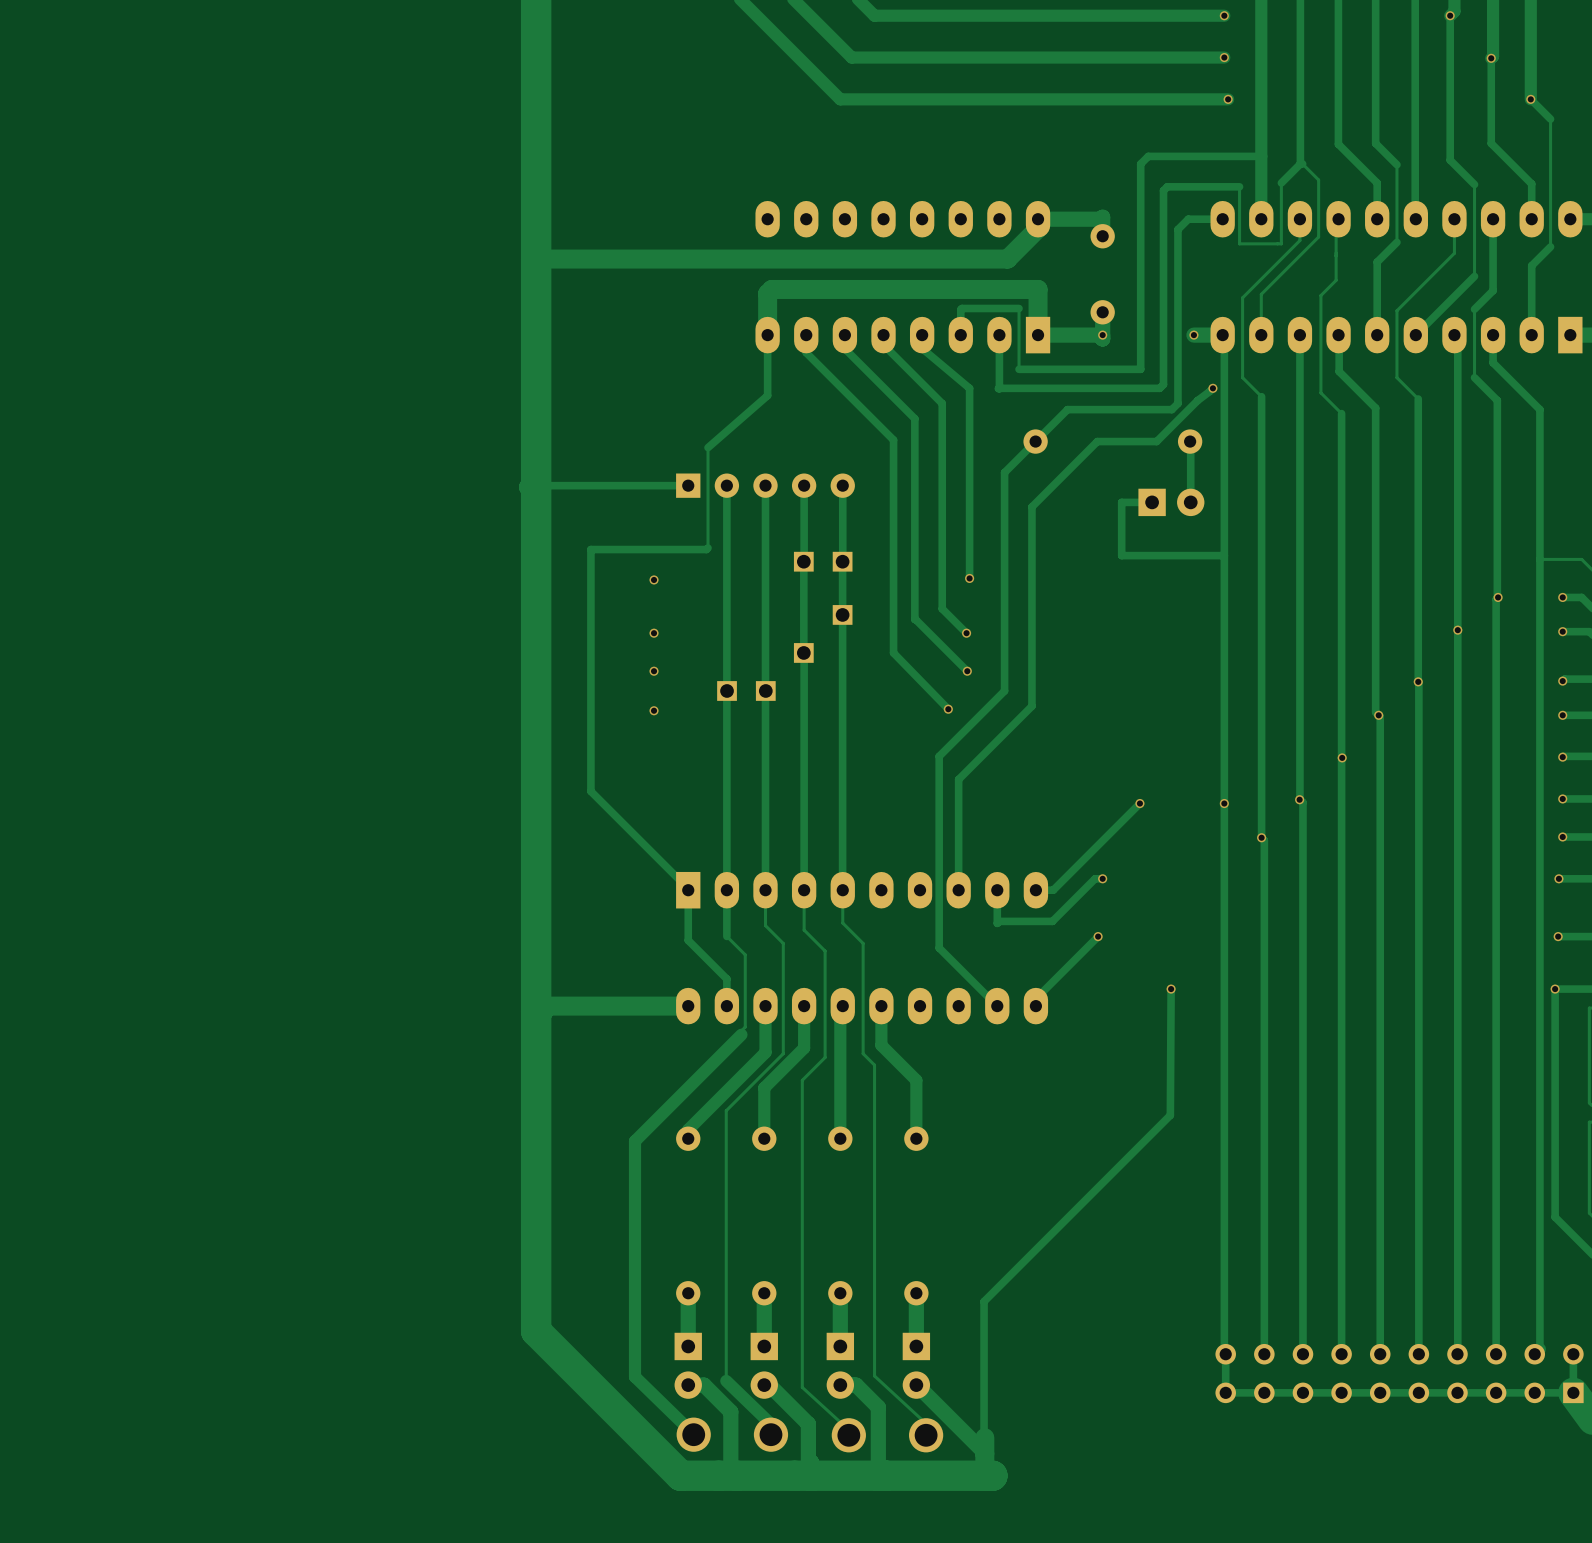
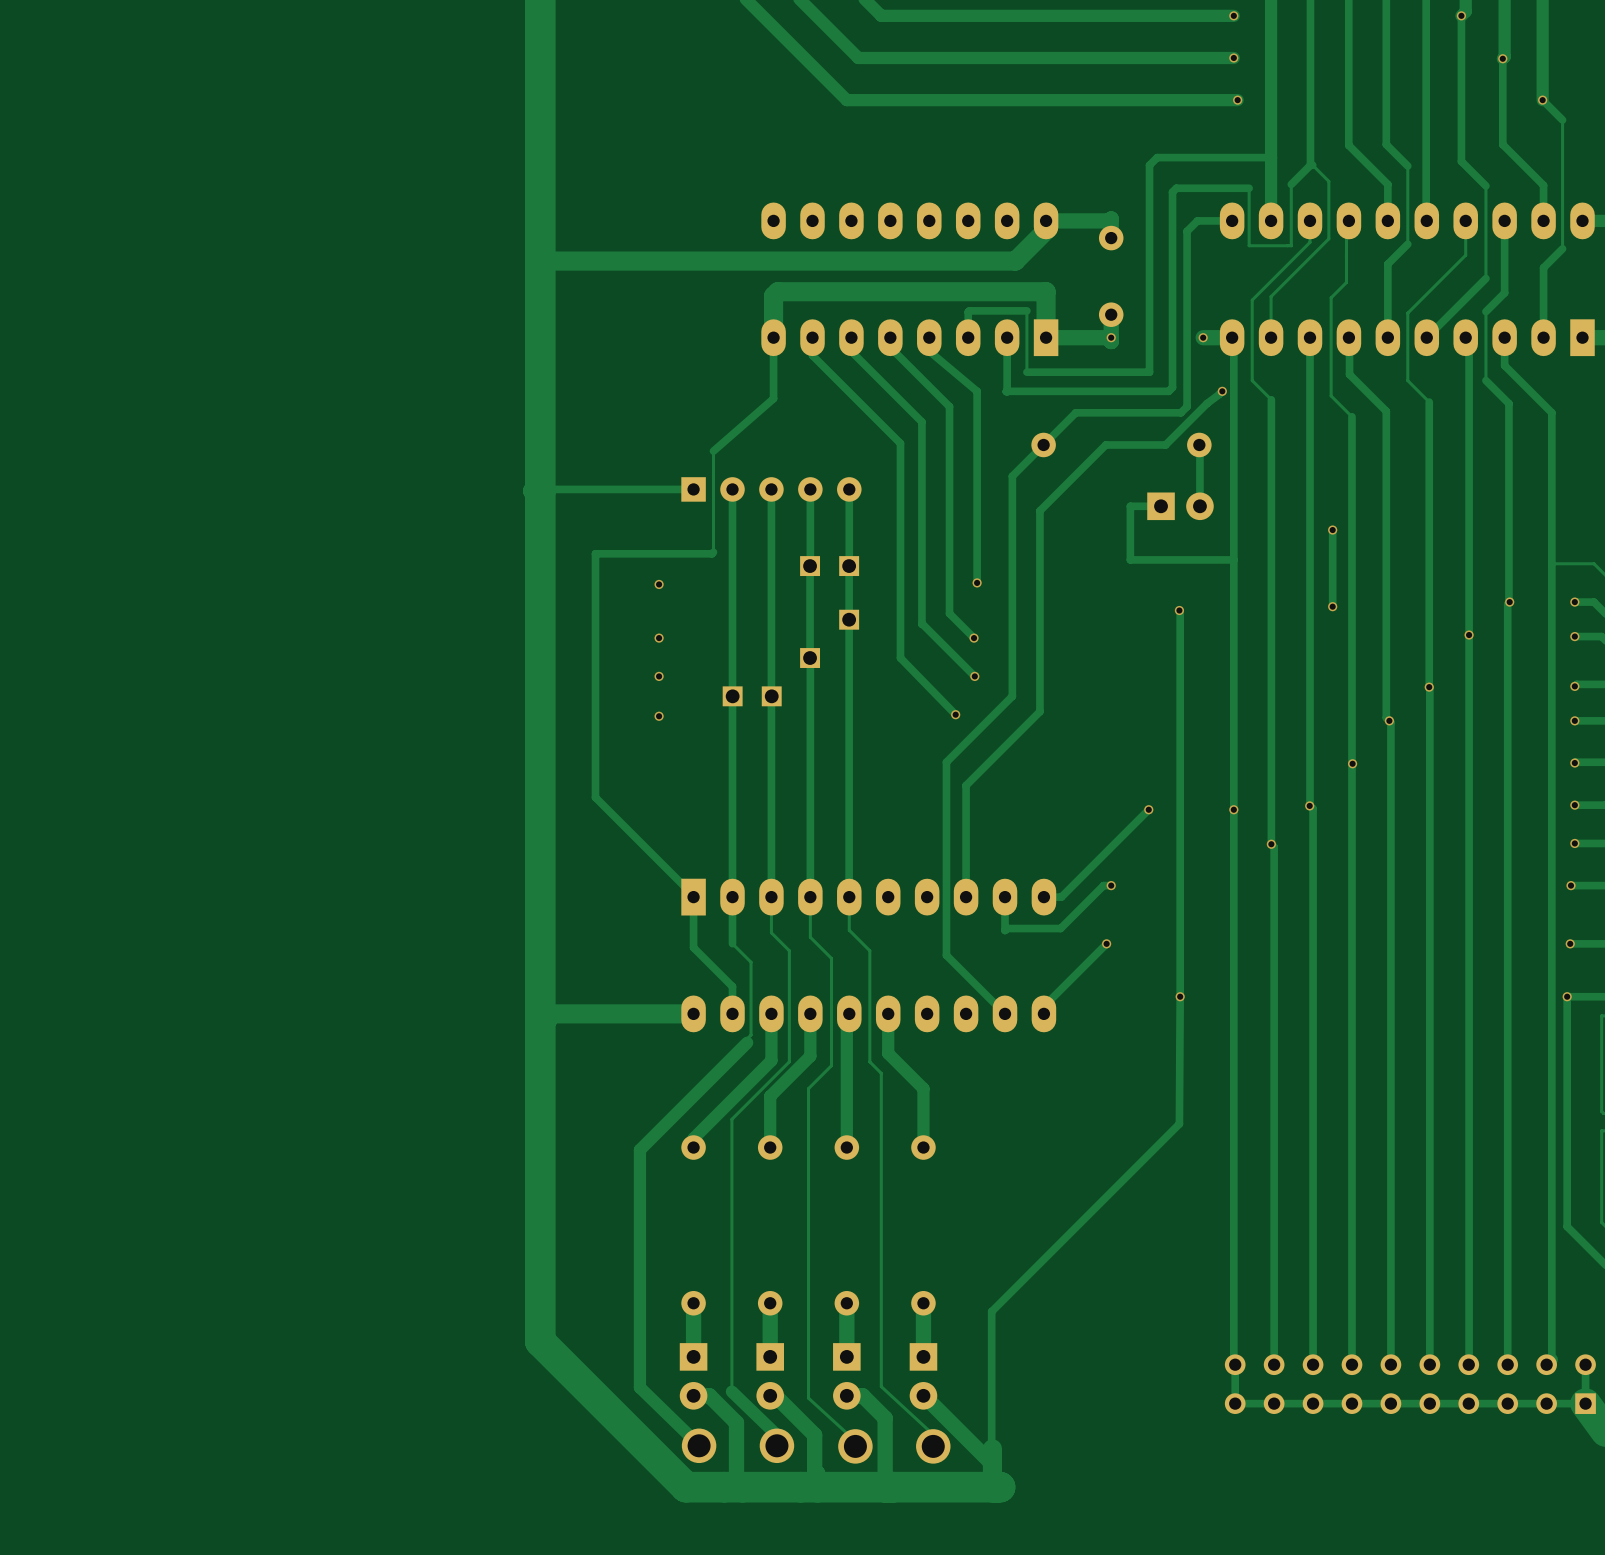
track: none -> (1332, 530) (1332, 606)
via: none -> (1332, 530)
via: none -> (1332, 606)
track: none -> (1179, 610) (1180, 992)
via: none -> (1179, 610)

